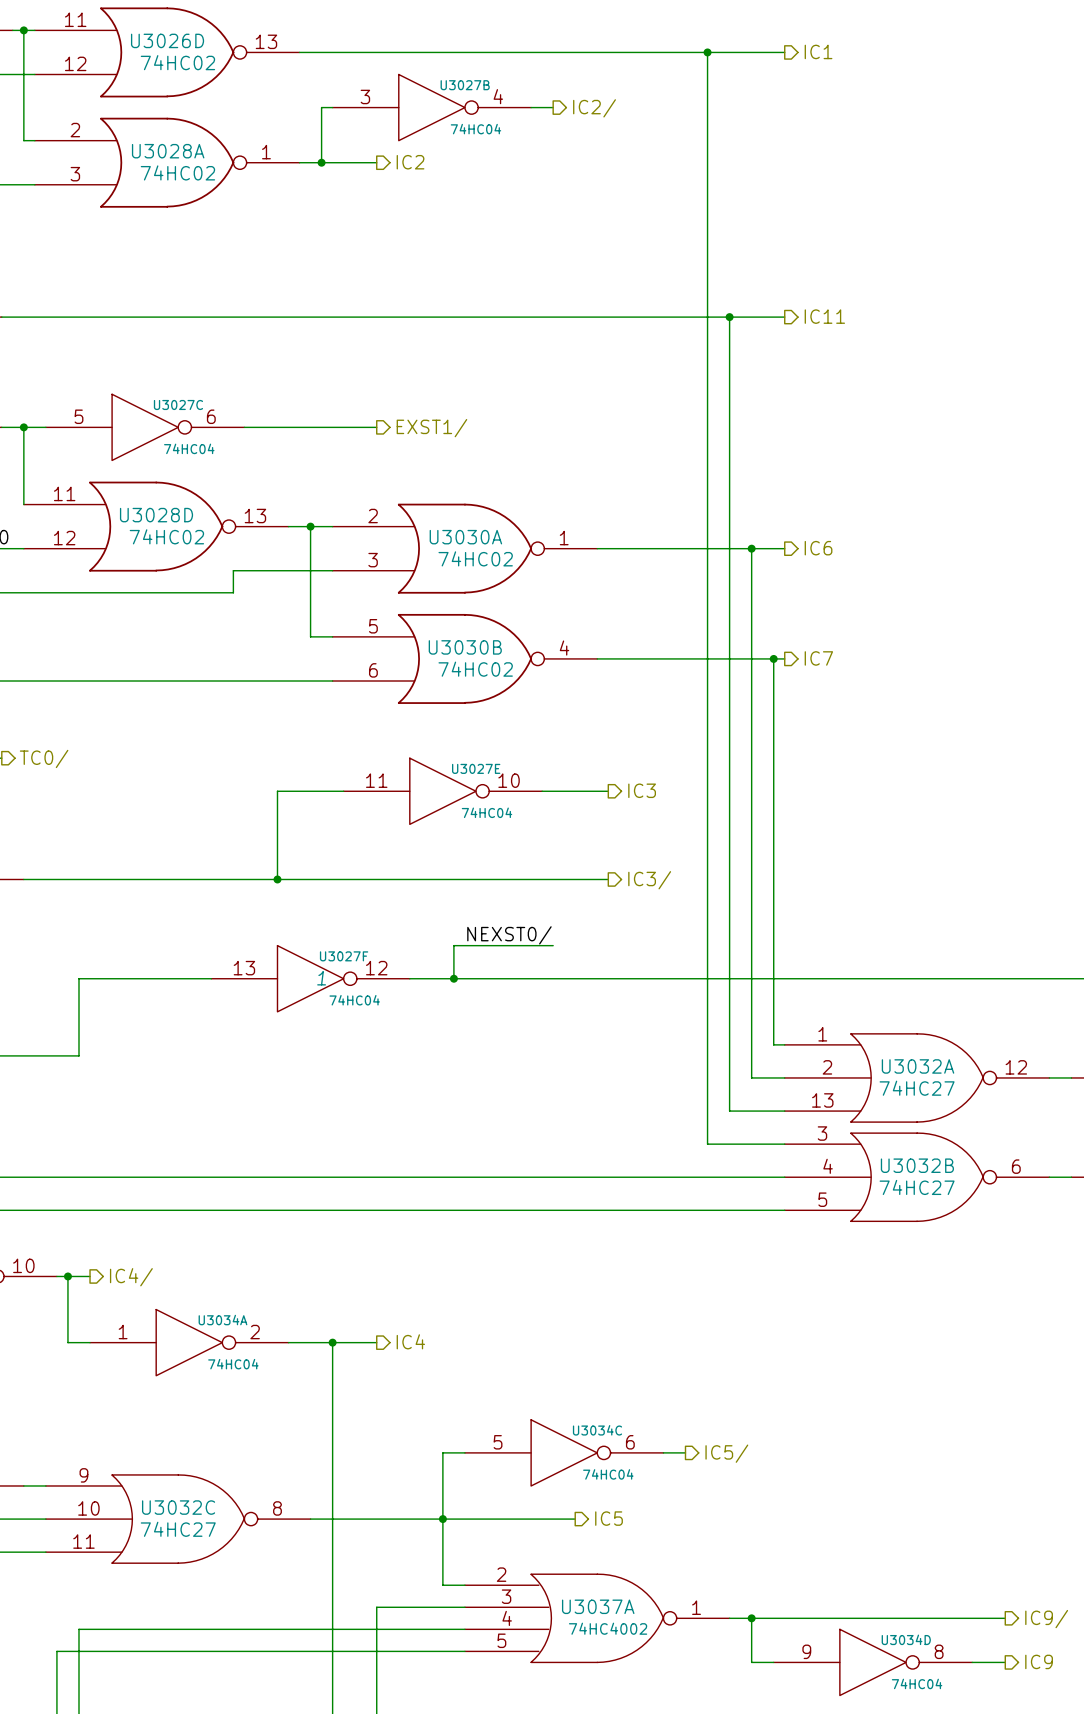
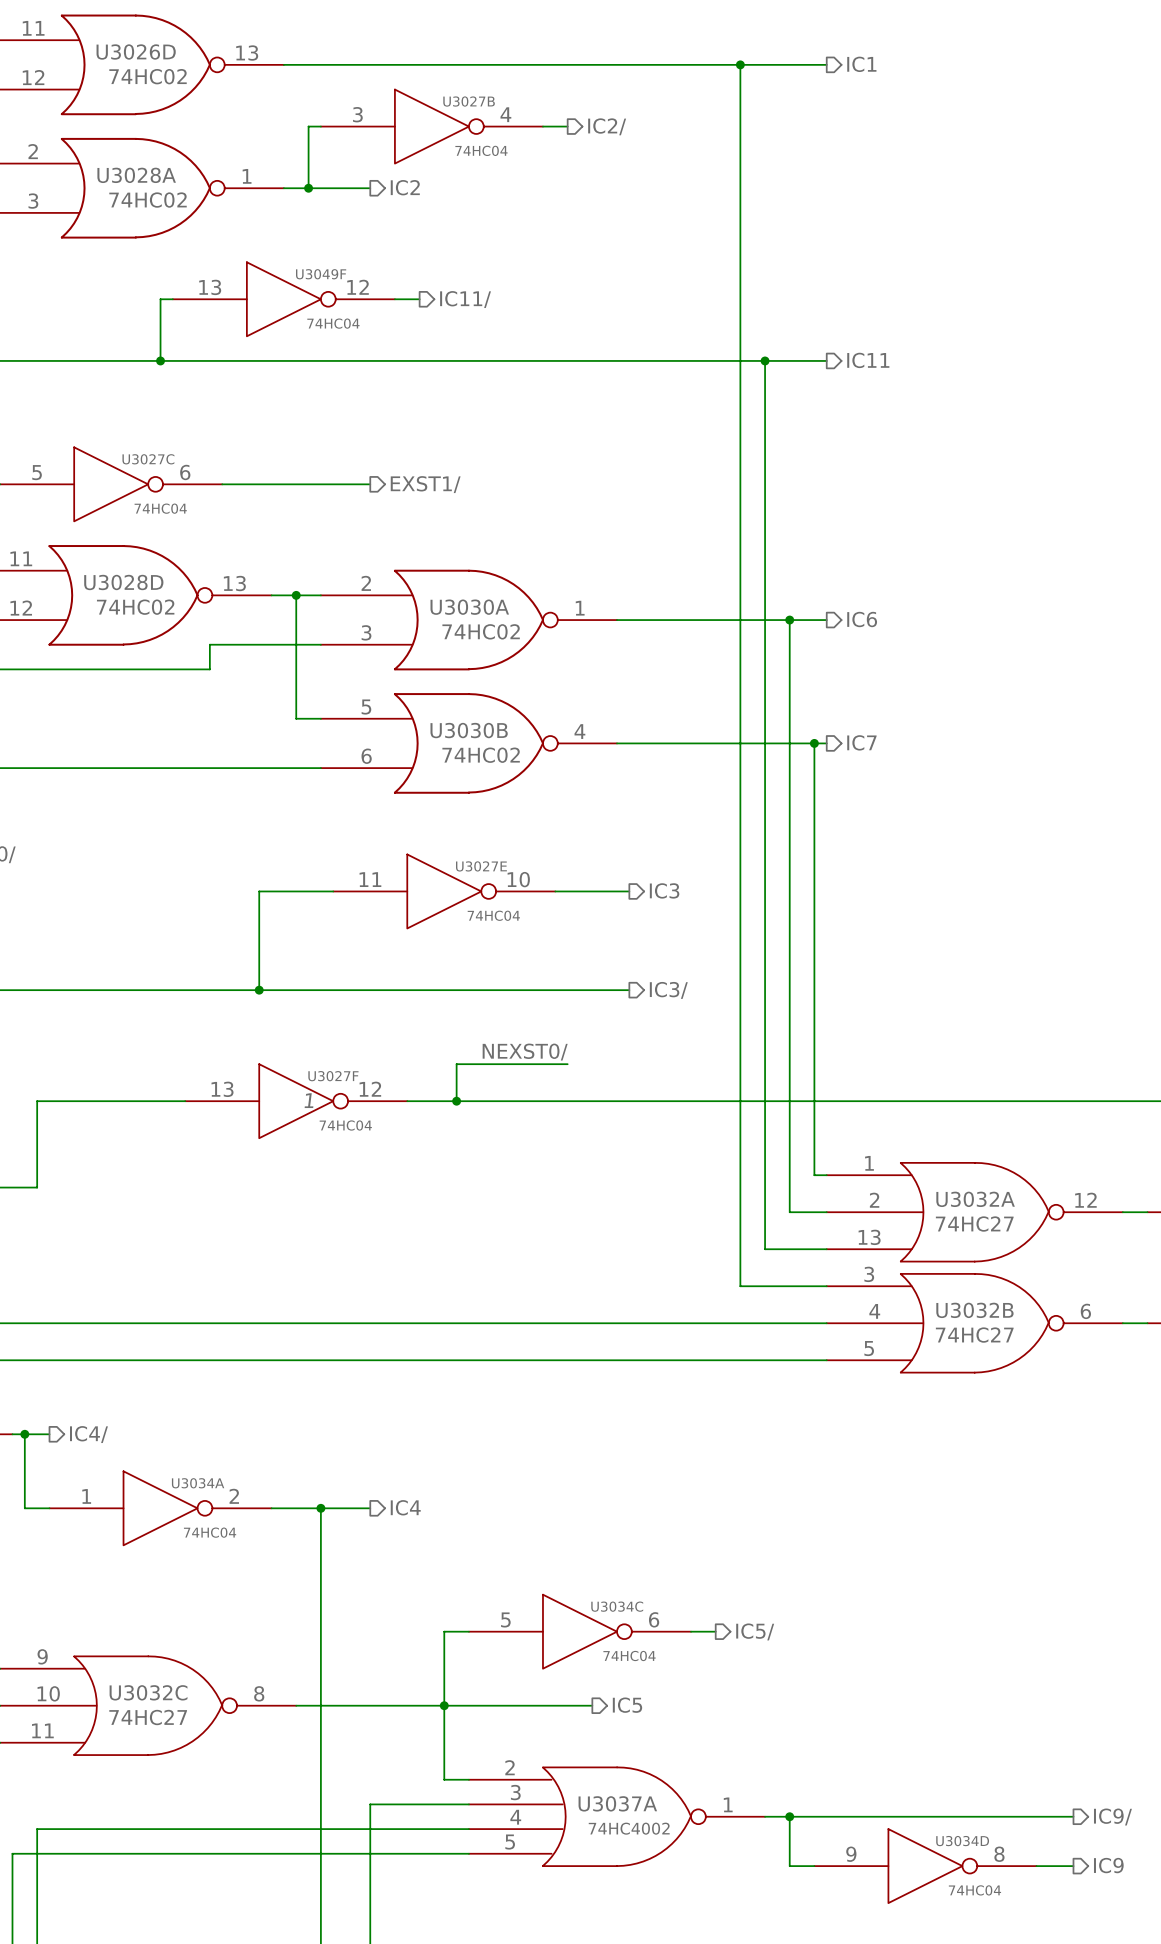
wire: none -> (172, 299) (160, 299) (160, 360)
U3049F: none -> 74HC04 (283, 299)
wire: none -> (394, 299) (419, 299)
hierarchical label: none -> IC11/ (465, 299)
junction: none -> (160, 360)

